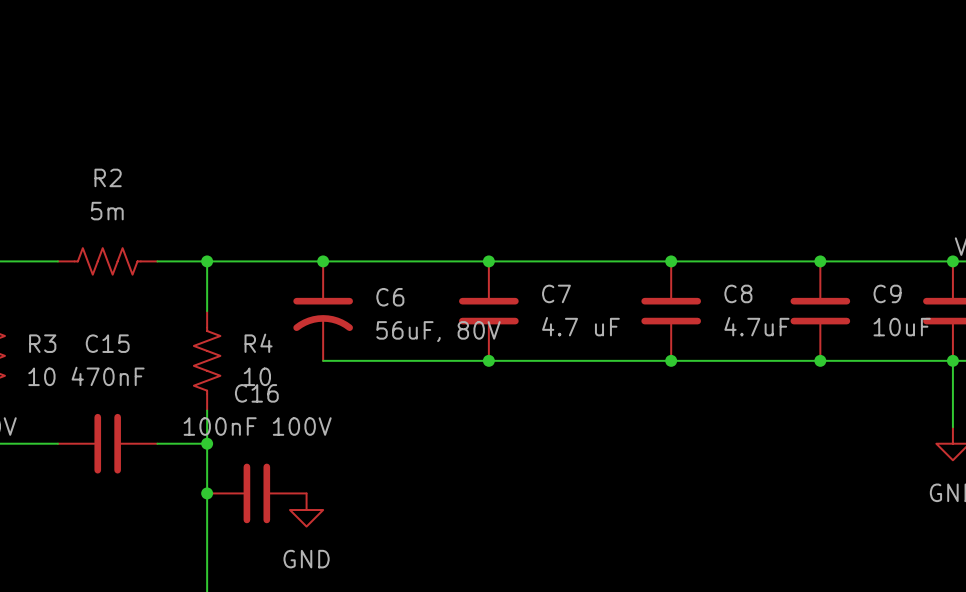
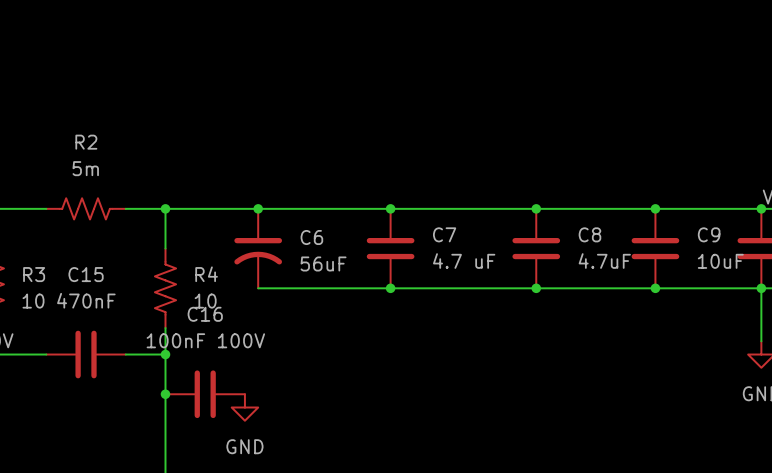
C6 value: 56uF, 80V (438, 331) -> 56uF (323, 263)

